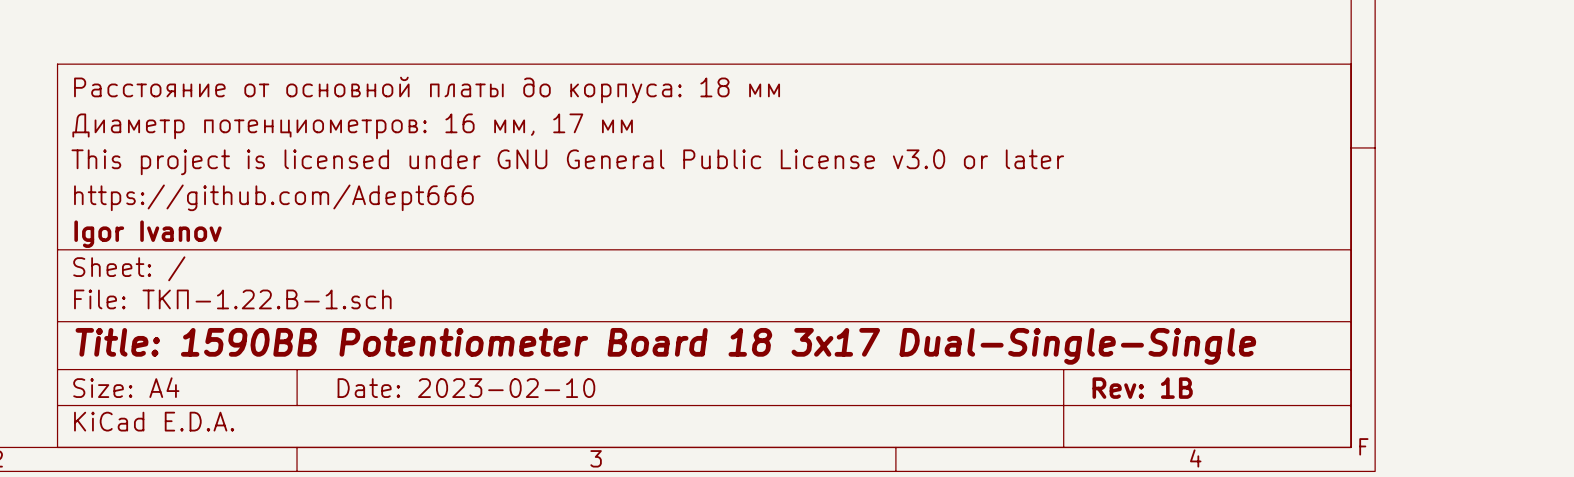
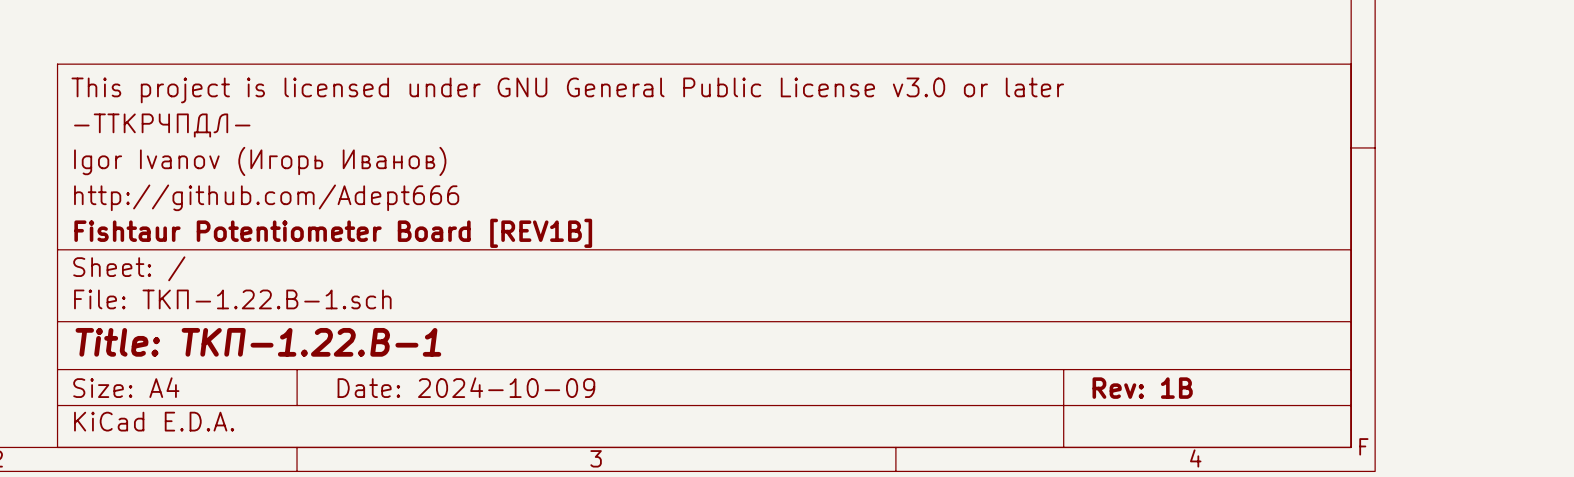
title block: Расстояние от основной платы до корпуса: 18 мм (427, 90) -> This project is licensed under GNU General Public License v3.0 or later (567, 90)
title block: Диаметр потенциометров: 16 мм, 17 мм (352, 126) -> -ТТКРЧПДЛ- (162, 125)
title block: This project is licensed under GNU General Public License v3.0 or later (567, 162) -> Igor Ivanov (Игорь Иванов) (260, 161)
title block: https://github.com/Adept666 (273, 197) -> http://github.com/Adept666 (266, 197)
title block: Igor Ivanov (148, 234) -> Fishtaur Potentiometer Board [REV1B] (333, 233)
title block: Title: 1590BB Potentiometer Board 18 3x17 Dual-Single-Single (665, 346) -> Title: ТКП-1.22.B-1 (258, 342)
title block: Date: 2023-02-10 (466, 388) -> Date: 2024-10-09 (466, 387)

